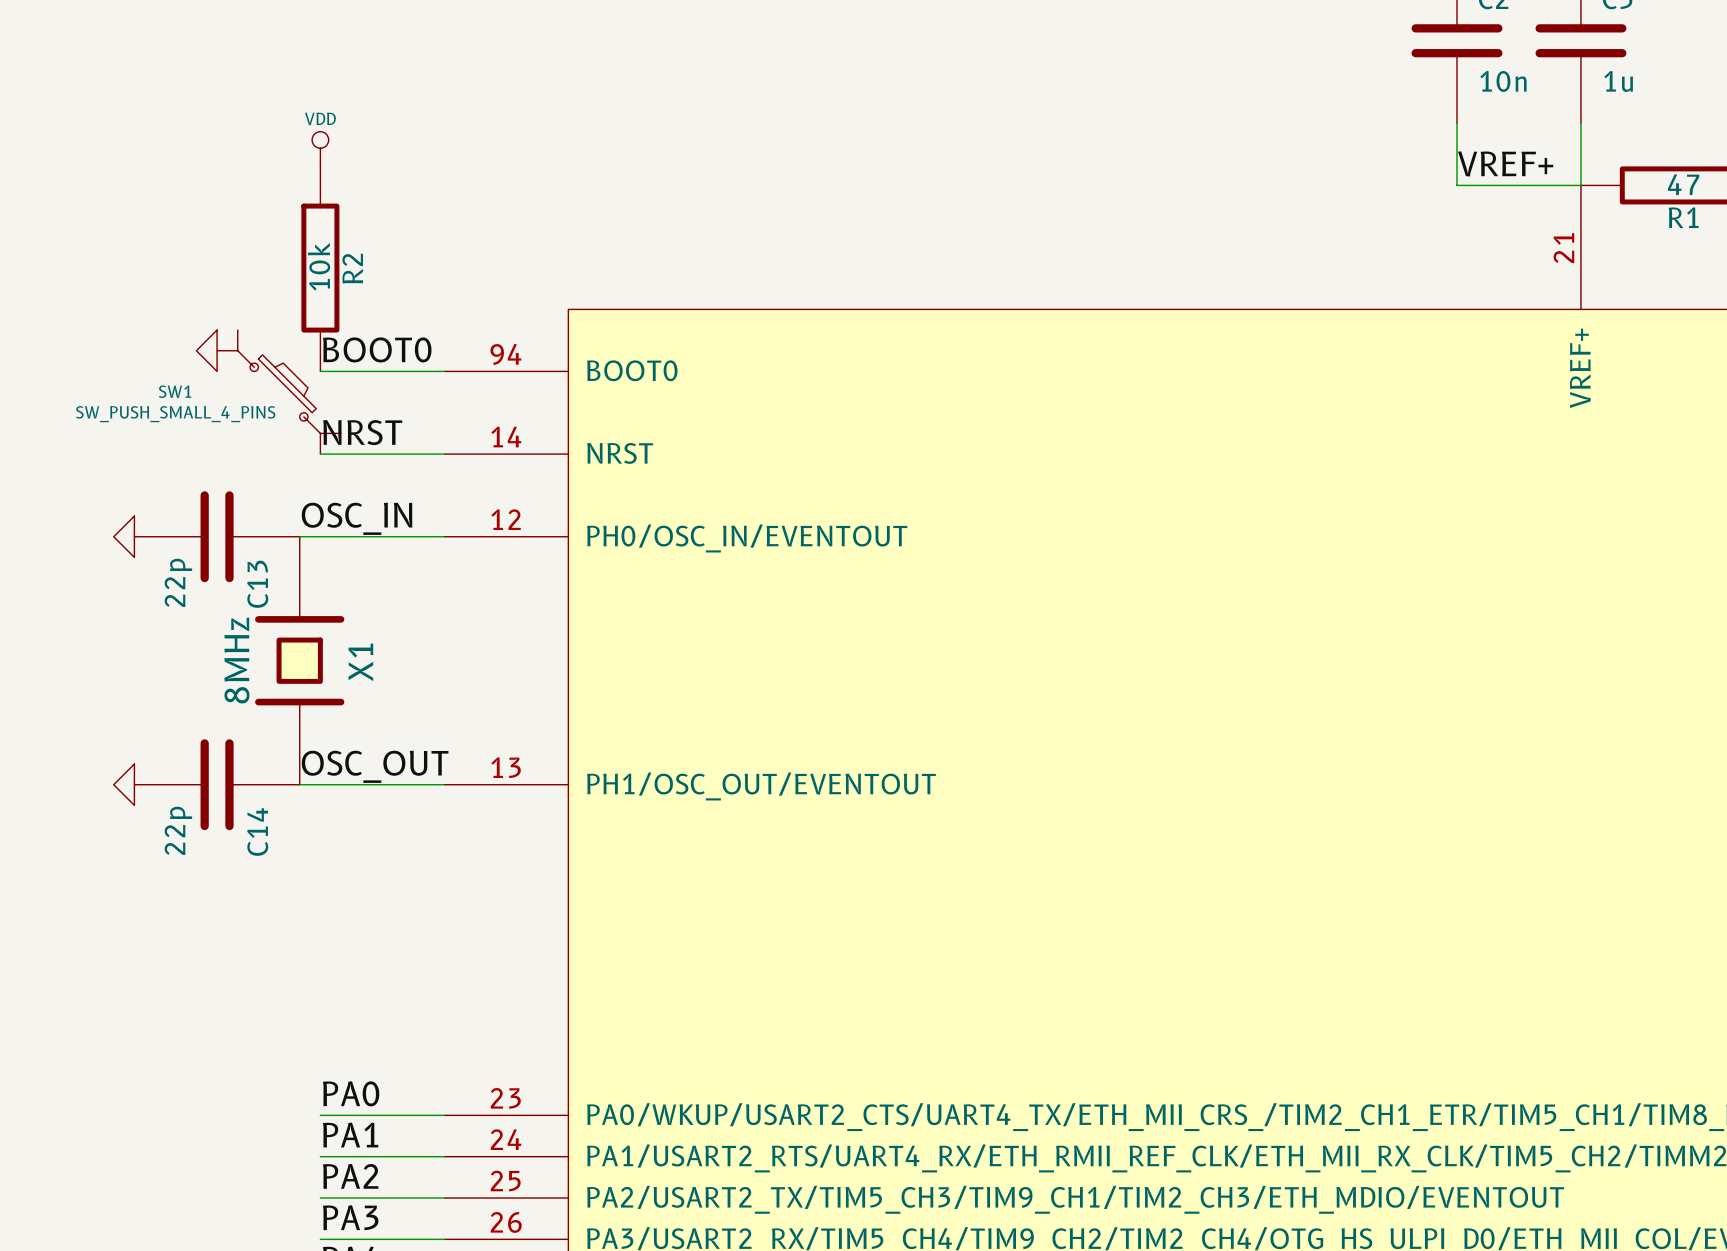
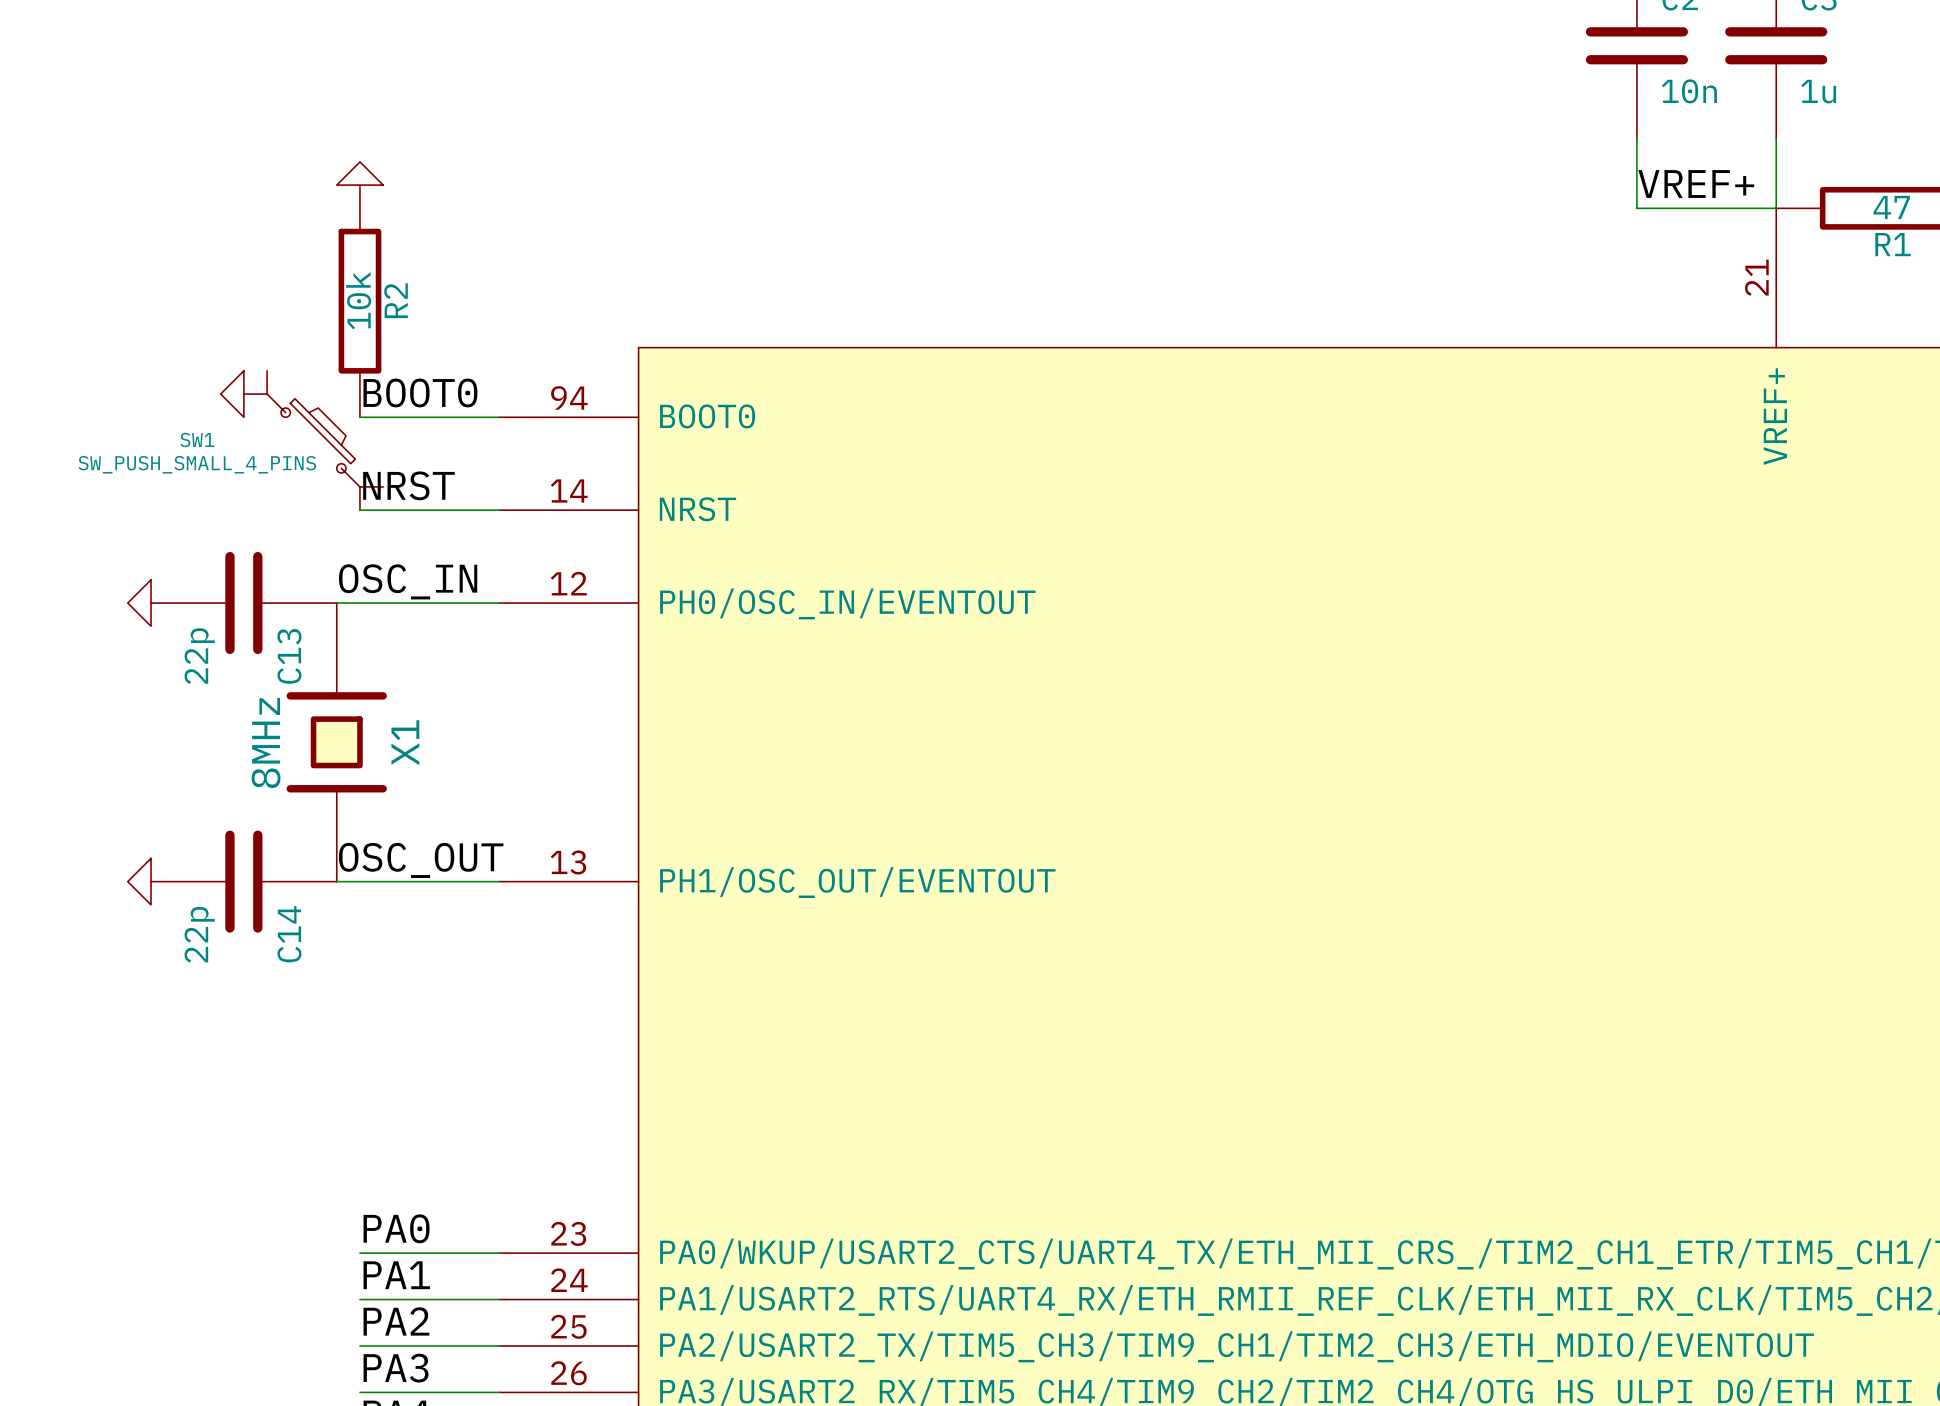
power symbol text: VDD (320, 118) -> none
power symbol shape: [312, 131, 329, 165] -> [336, 161, 384, 186]

